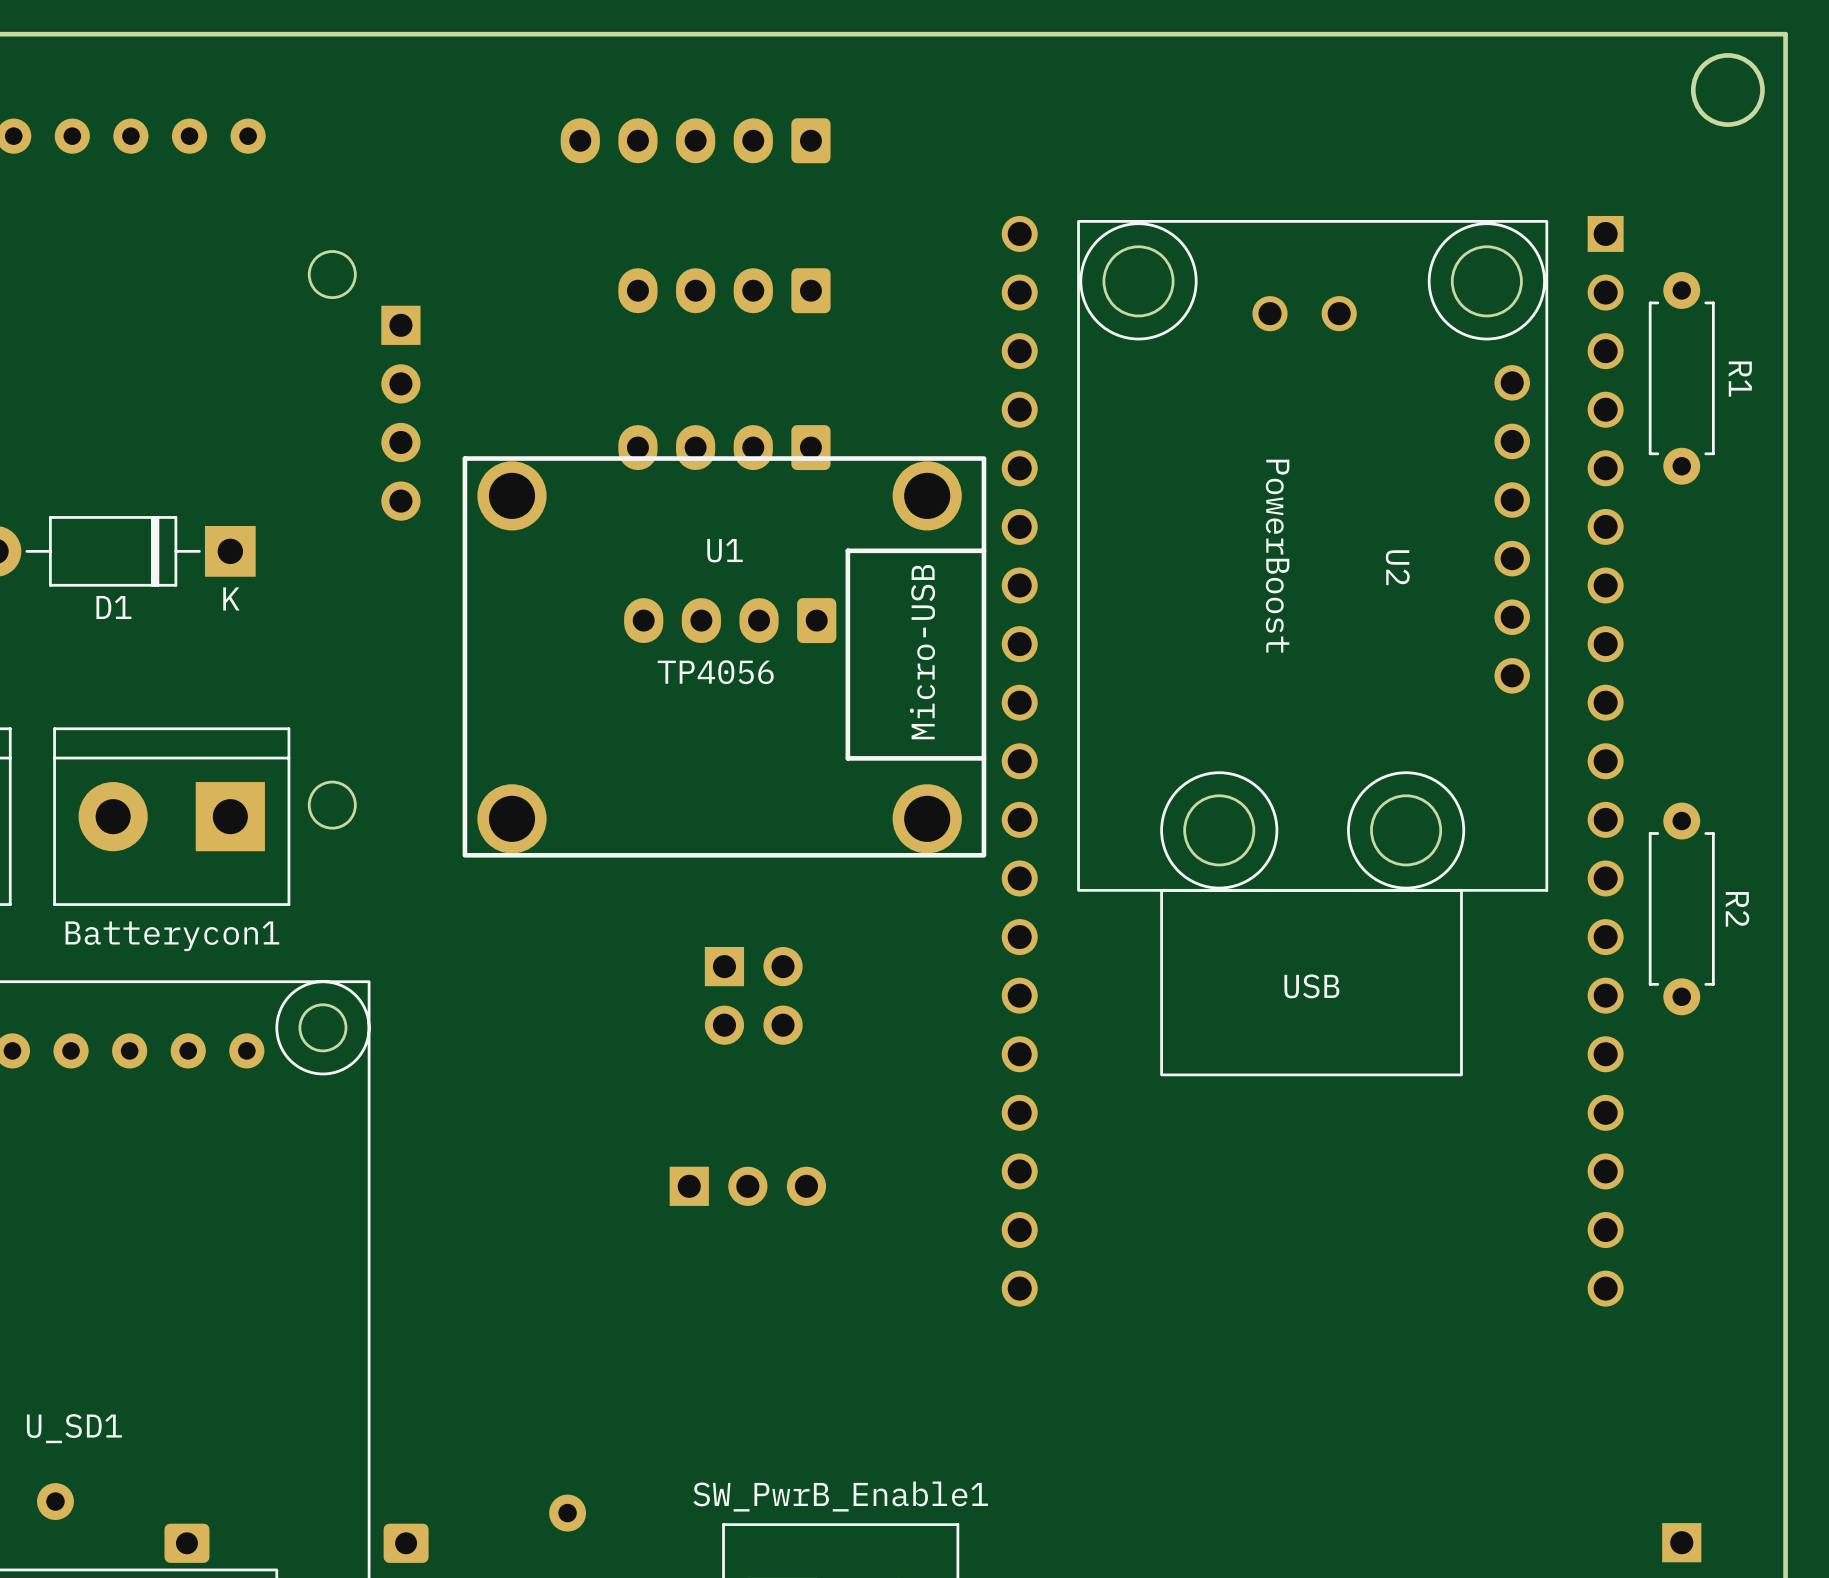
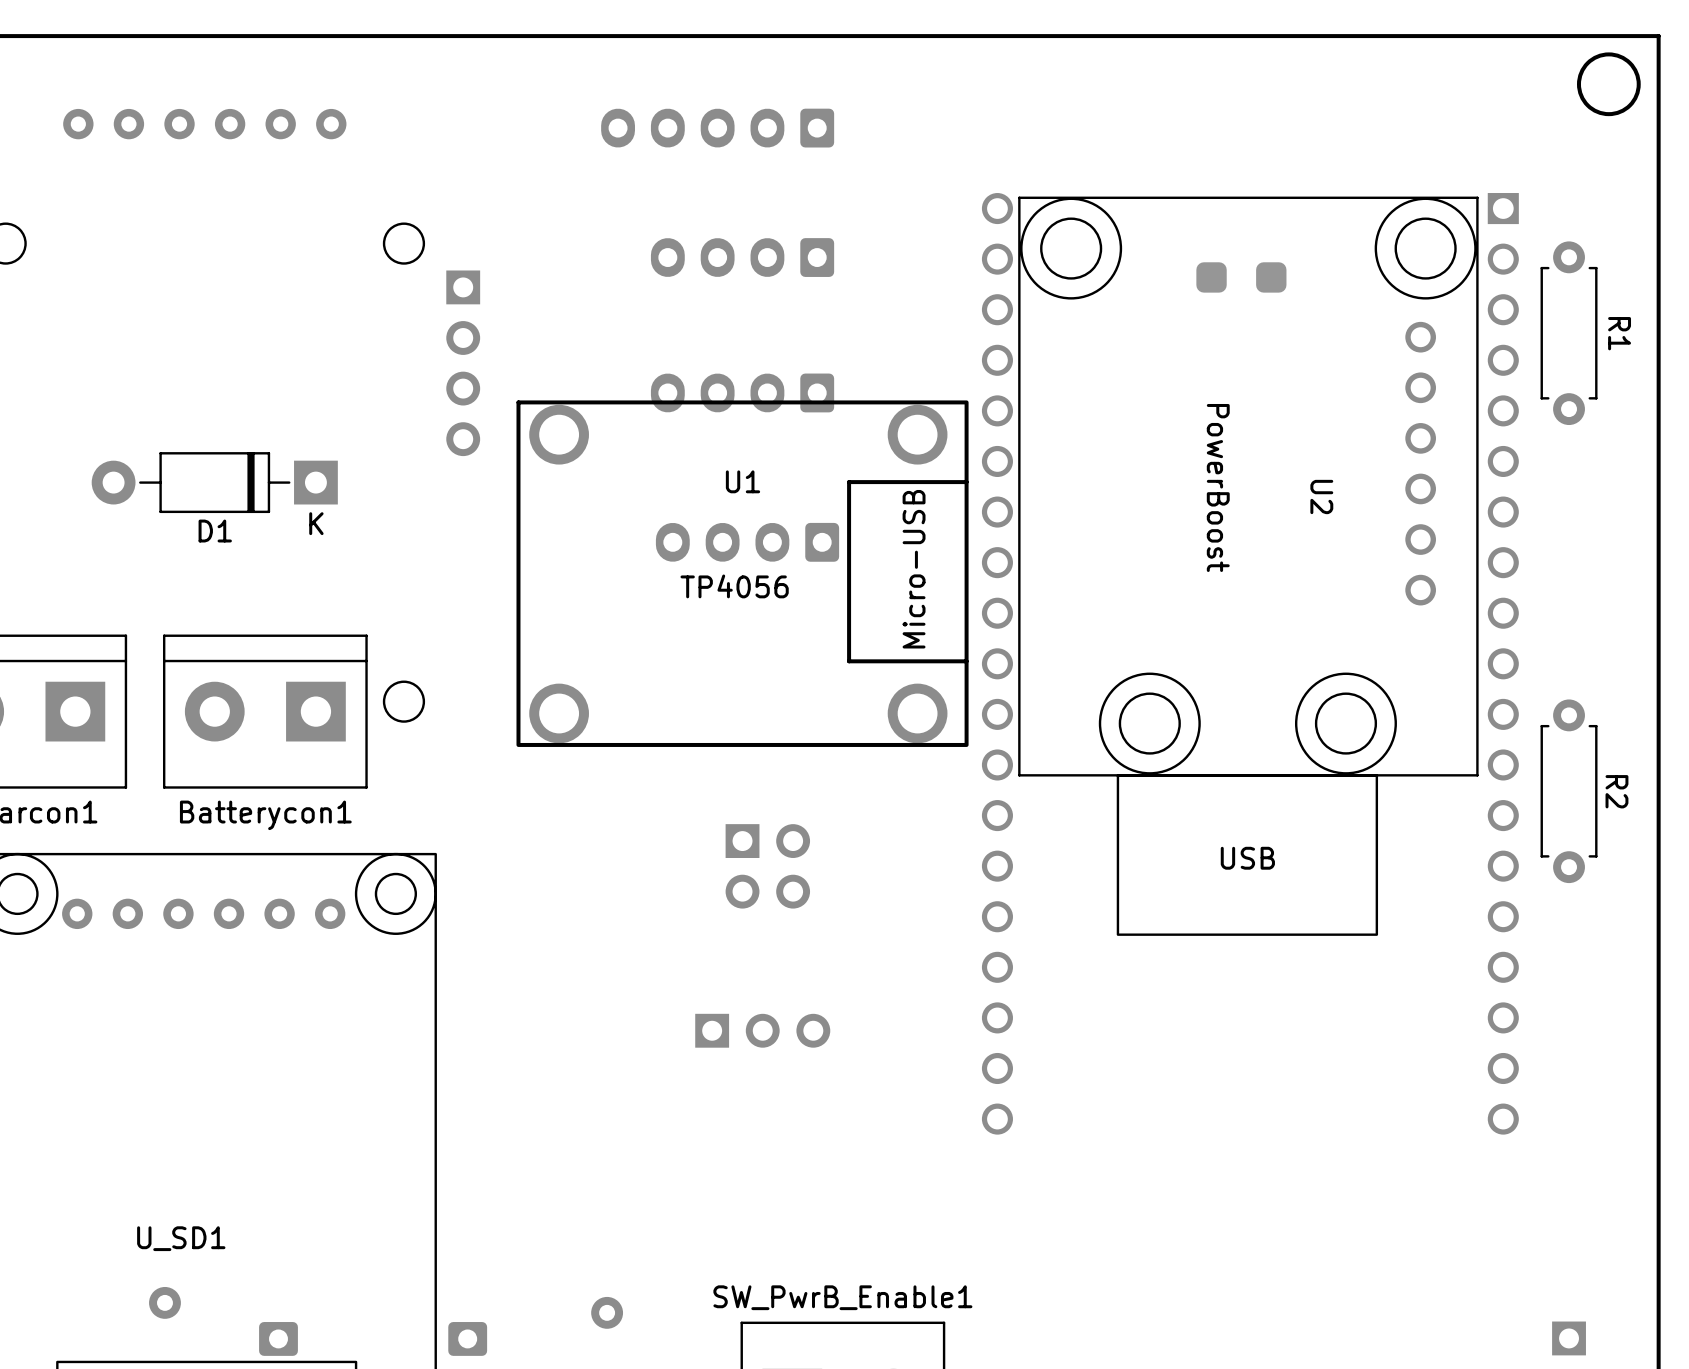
U2 footprint: [1077, 220, 1549, 1077] -> [1018, 196, 1479, 936]

